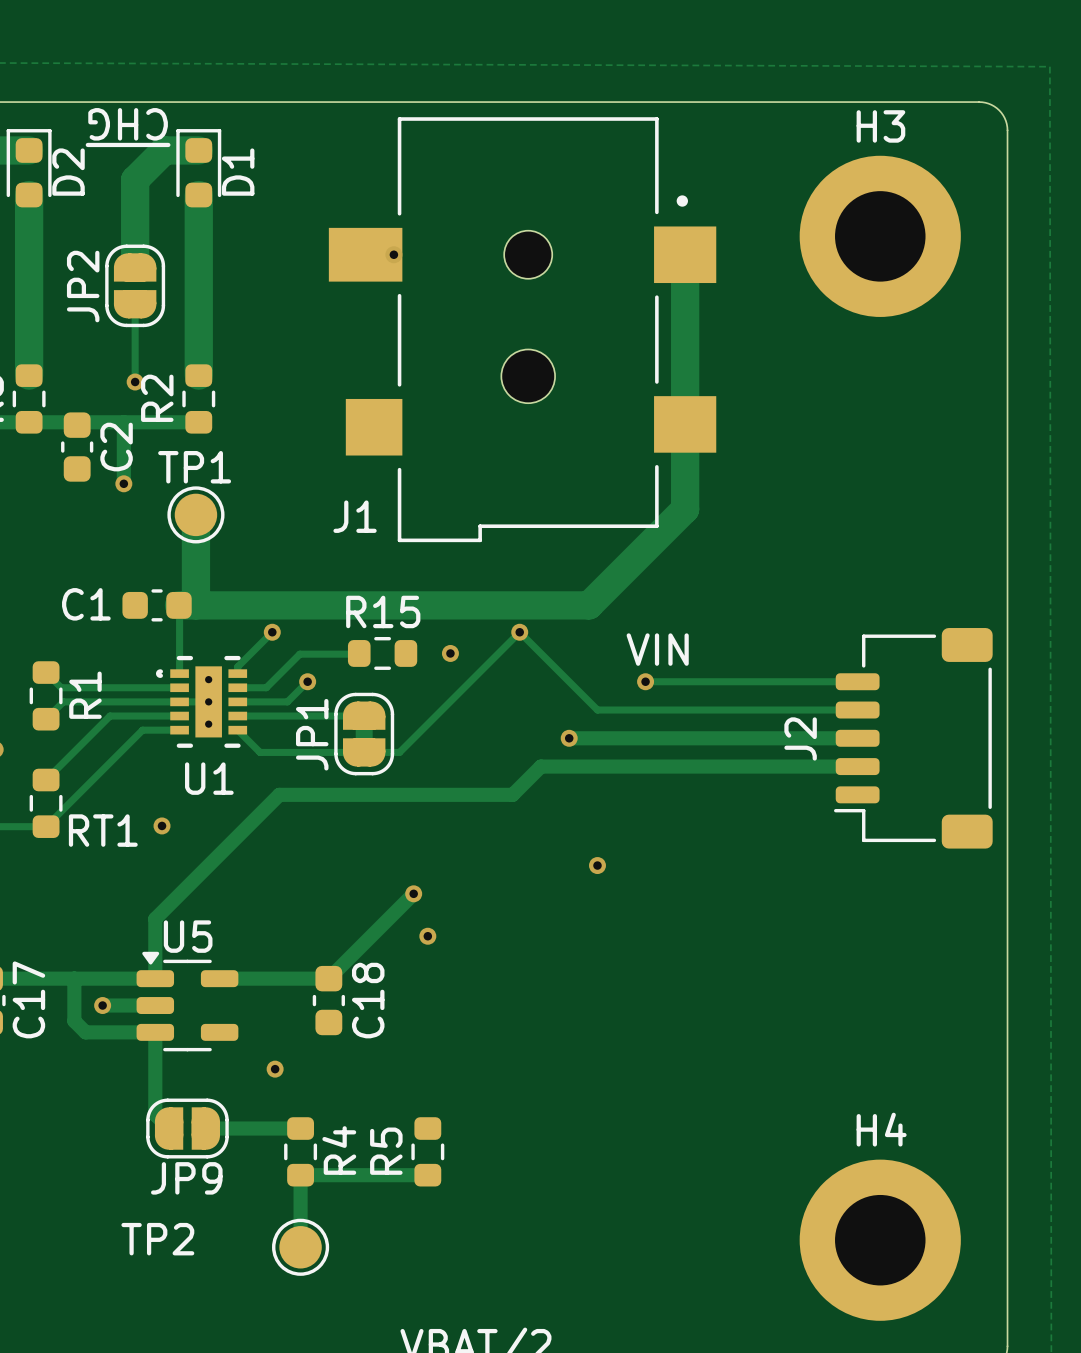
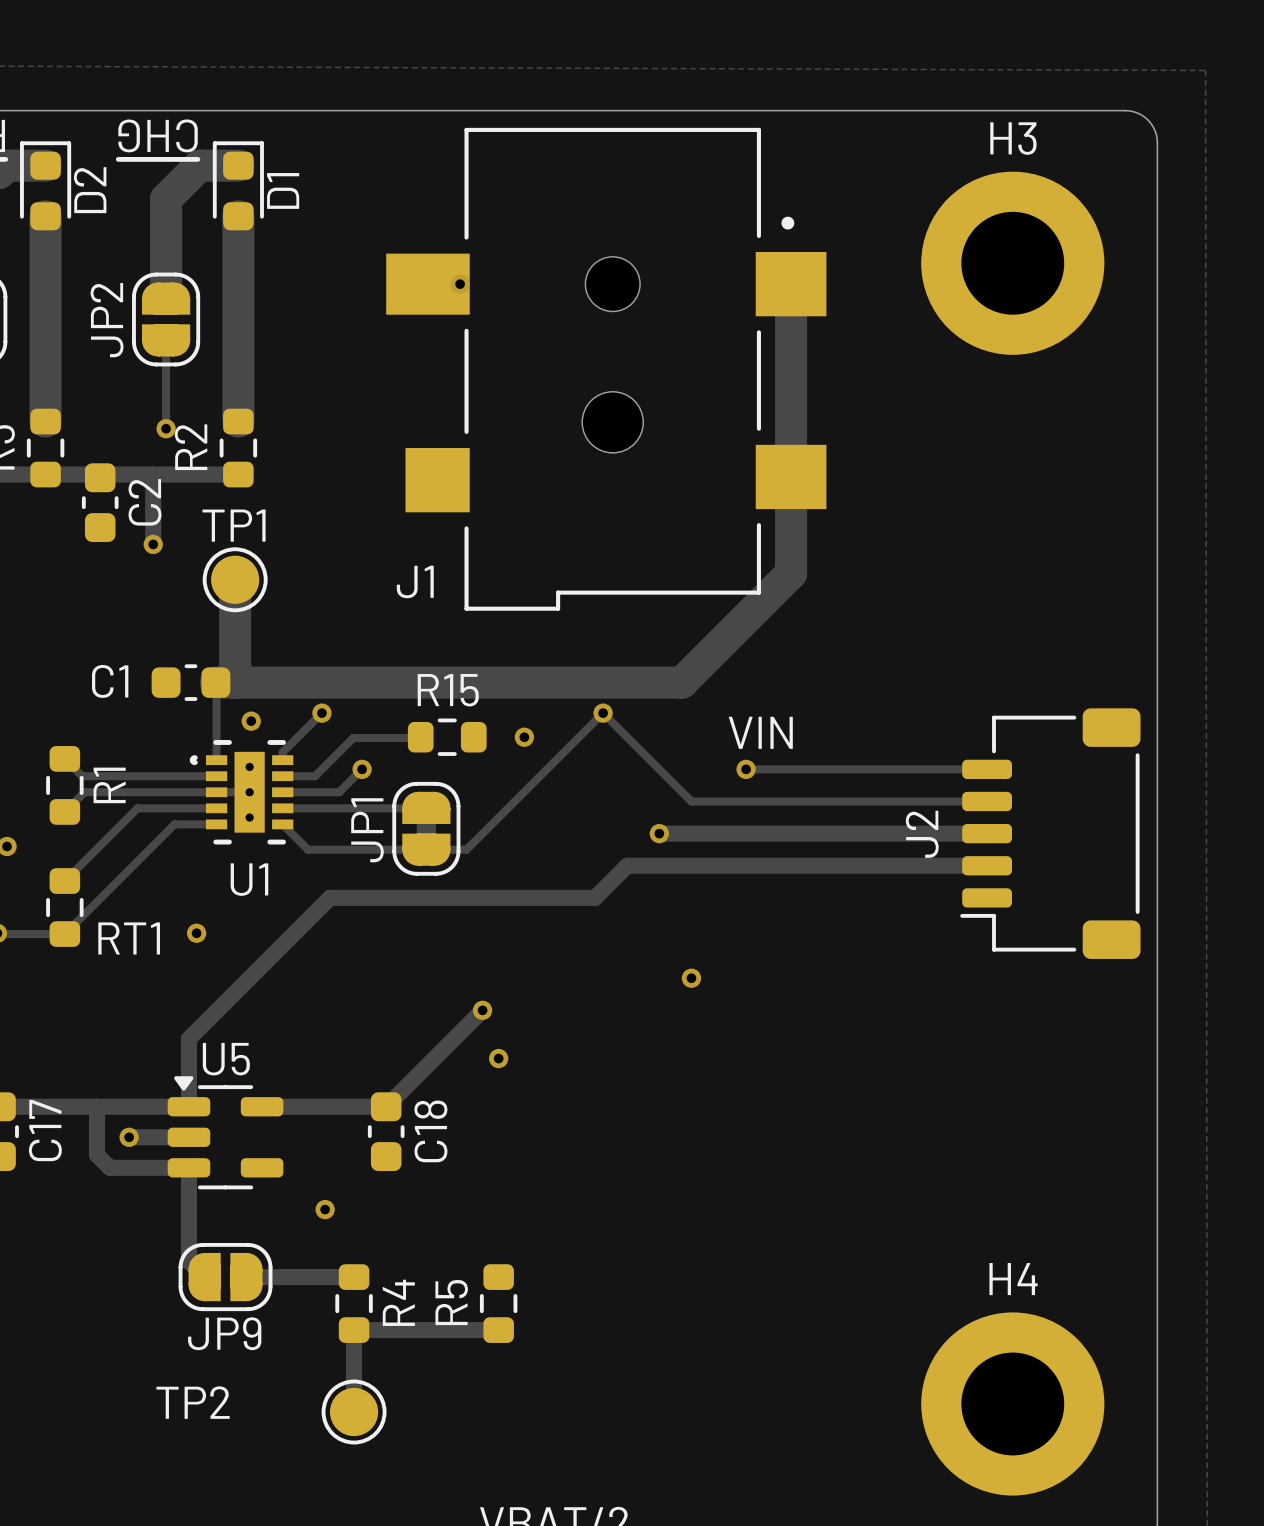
via: none -> (251, 721)

